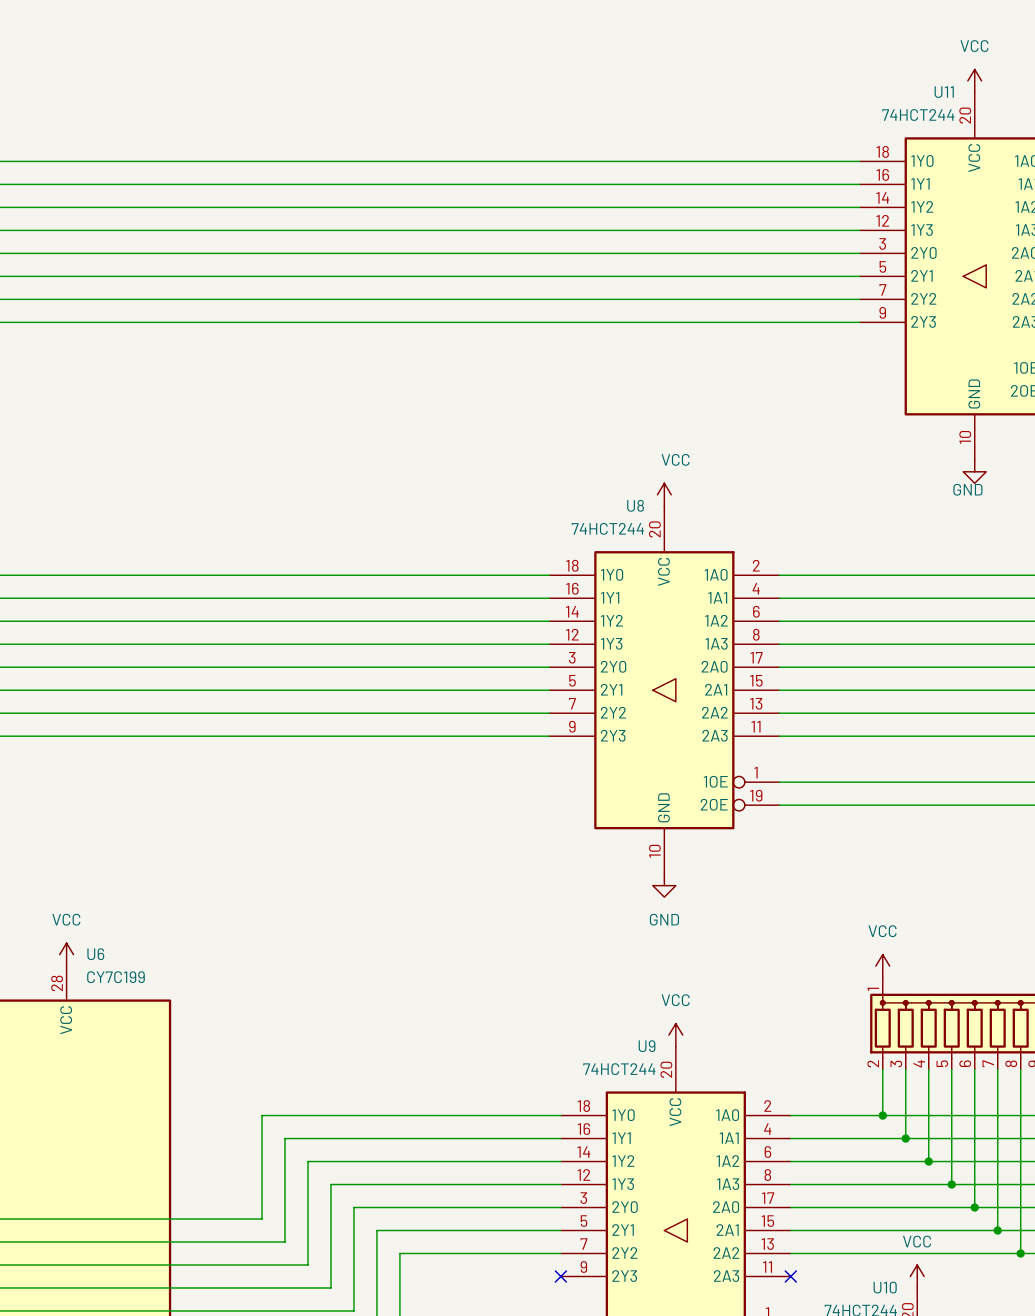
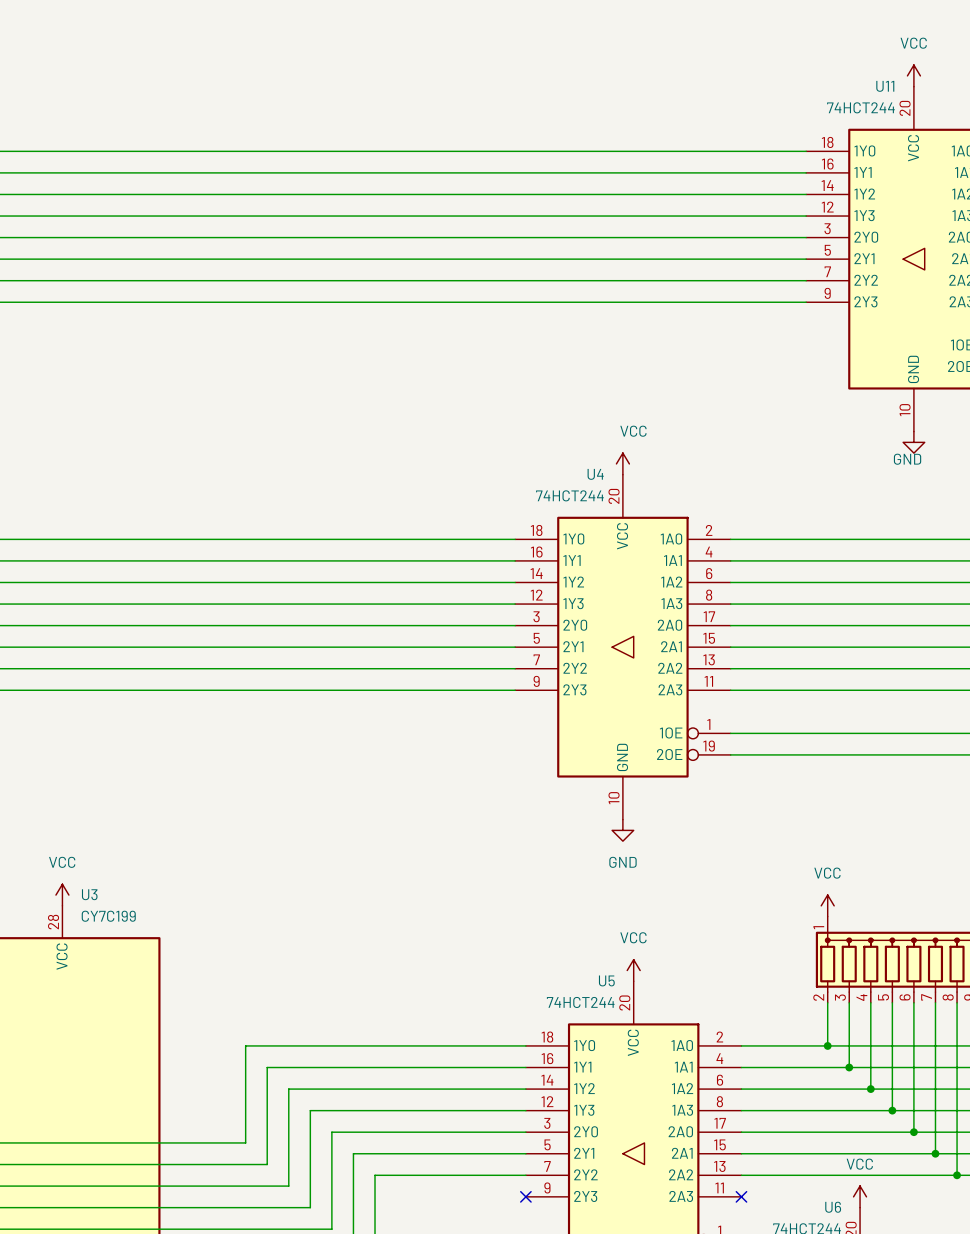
U8 name: U8 (635, 505) -> U4 (595, 474)
U6 name: U6 (95, 954) -> U3 (89, 894)
U9 name: U9 (647, 1046) -> U5 (606, 980)
U10 name: U10 (885, 1287) -> U6 (833, 1207)

